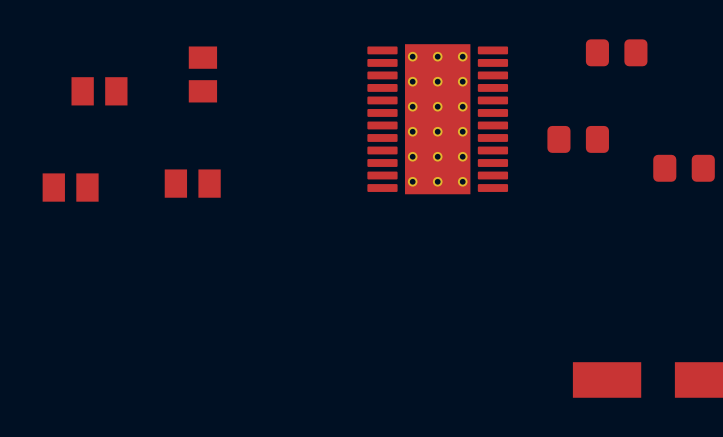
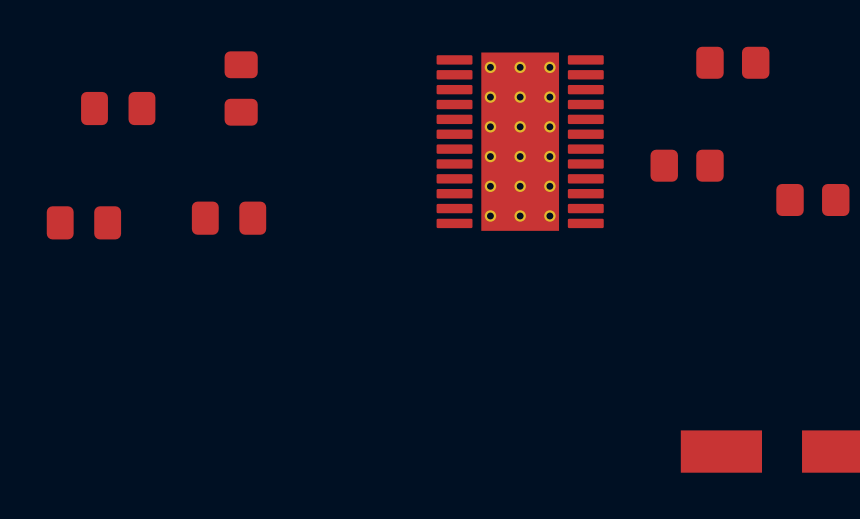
part footprint: [188, 46, 218, 103] -> [224, 51, 258, 126]
part footprint: [71, 77, 128, 106] -> [81, 91, 156, 126]
part footprint: [164, 169, 221, 198] -> [191, 201, 267, 235]
part footprint: [42, 173, 99, 202] -> [46, 206, 122, 240]

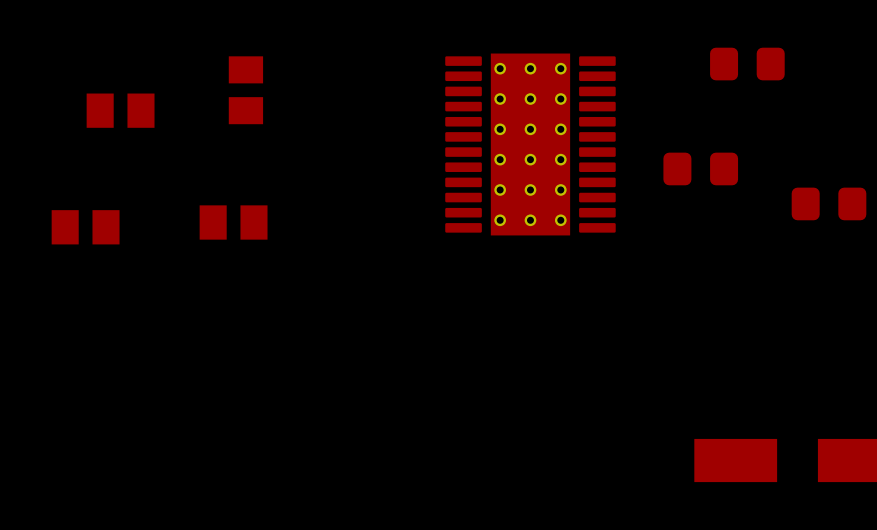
part footprint: [224, 51, 258, 126] -> [228, 56, 264, 125]
part footprint: [81, 91, 156, 126] -> [86, 93, 155, 128]
part footprint: [191, 201, 267, 235] -> [199, 205, 268, 240]
part footprint: [46, 206, 122, 240] -> [51, 210, 120, 245]

